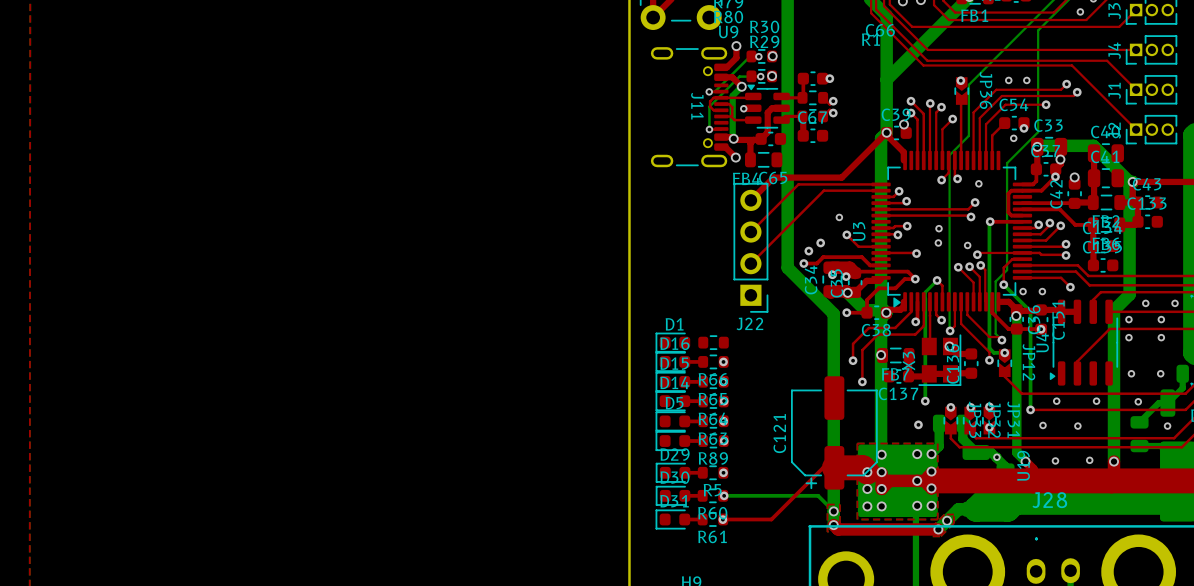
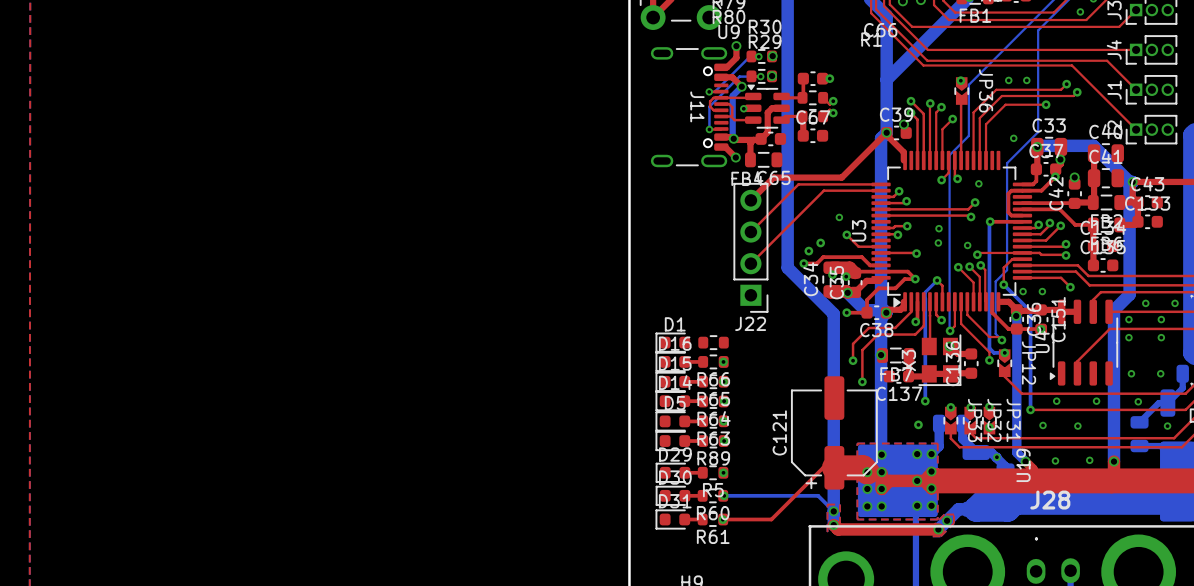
top track: (1004, 123) (992, 135) (992, 160) -> none
C54: (1014, 123) -> none
via: (1024, 128) -> none

